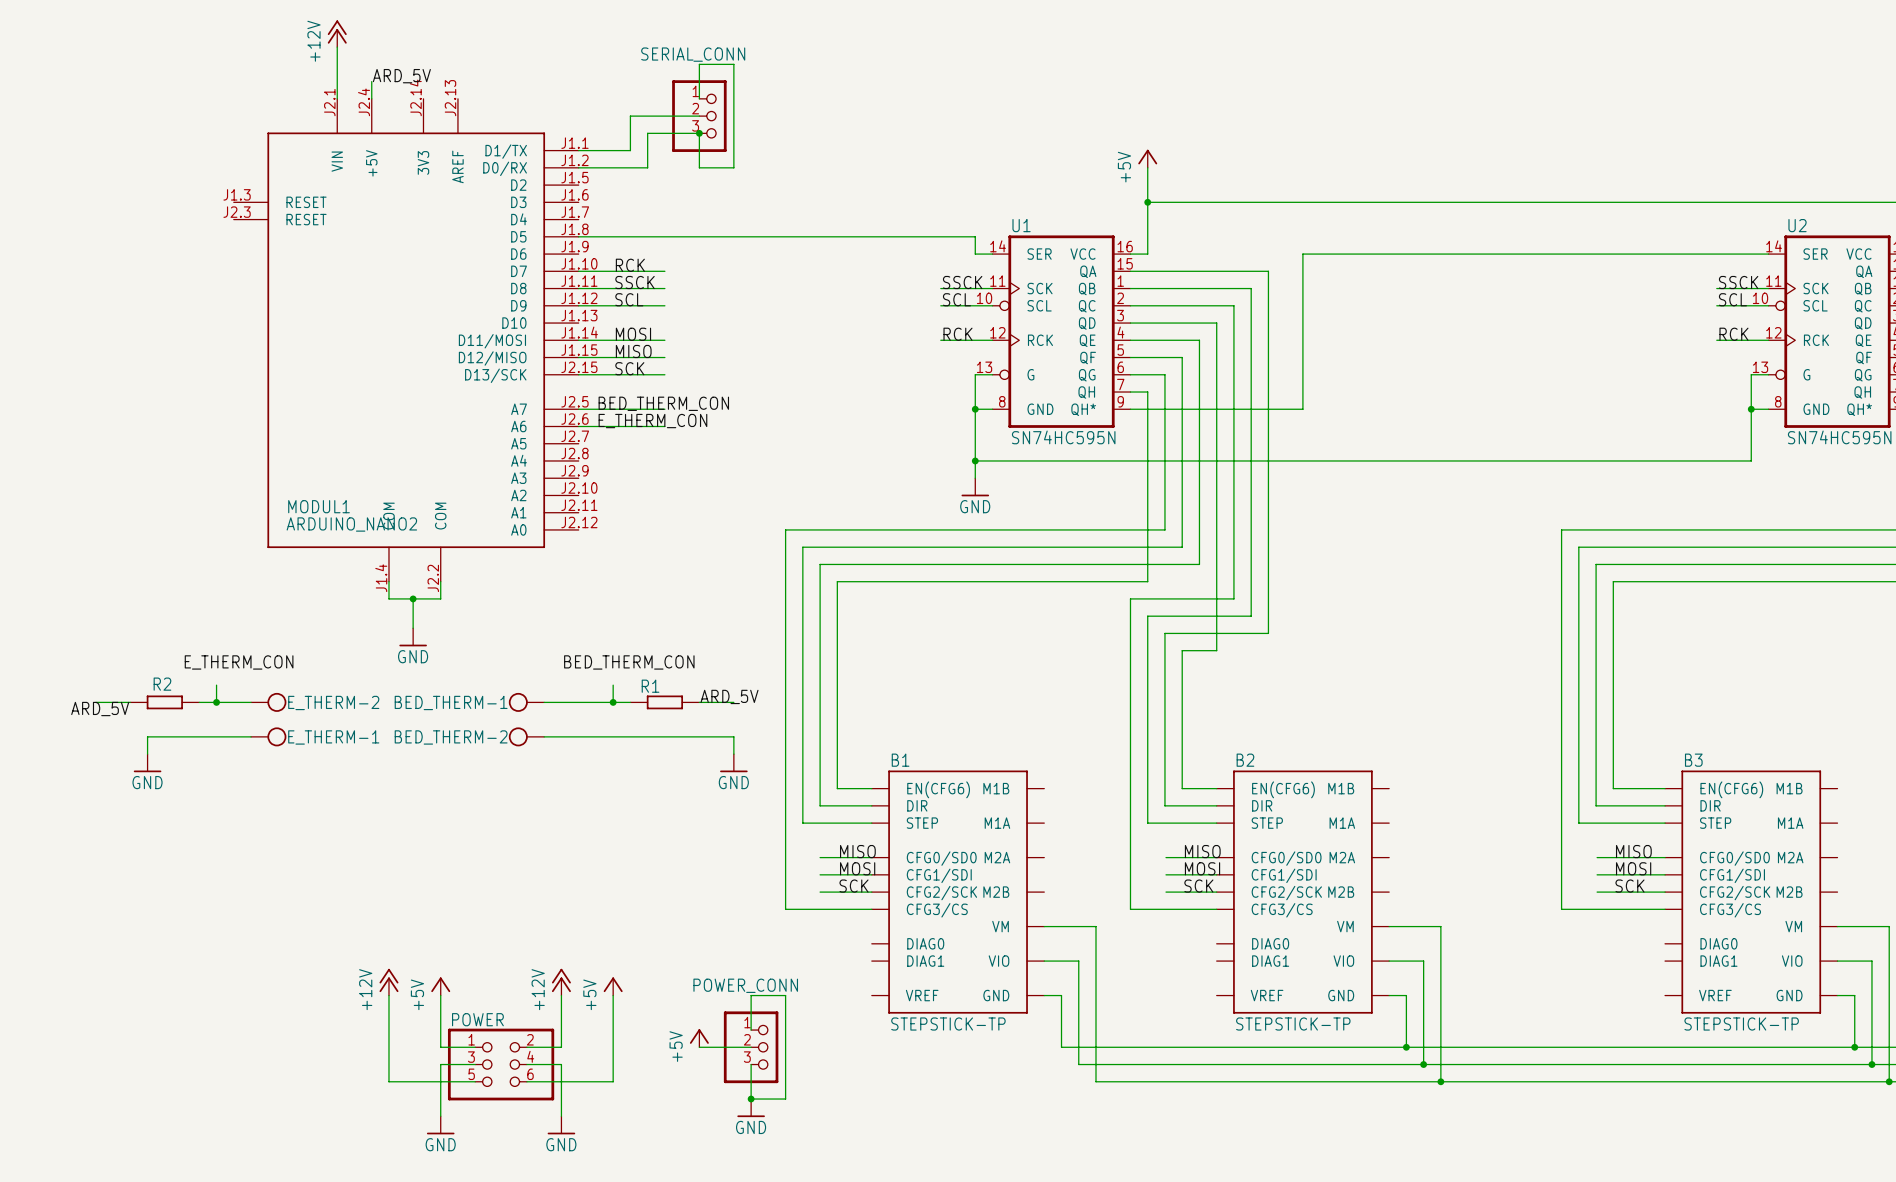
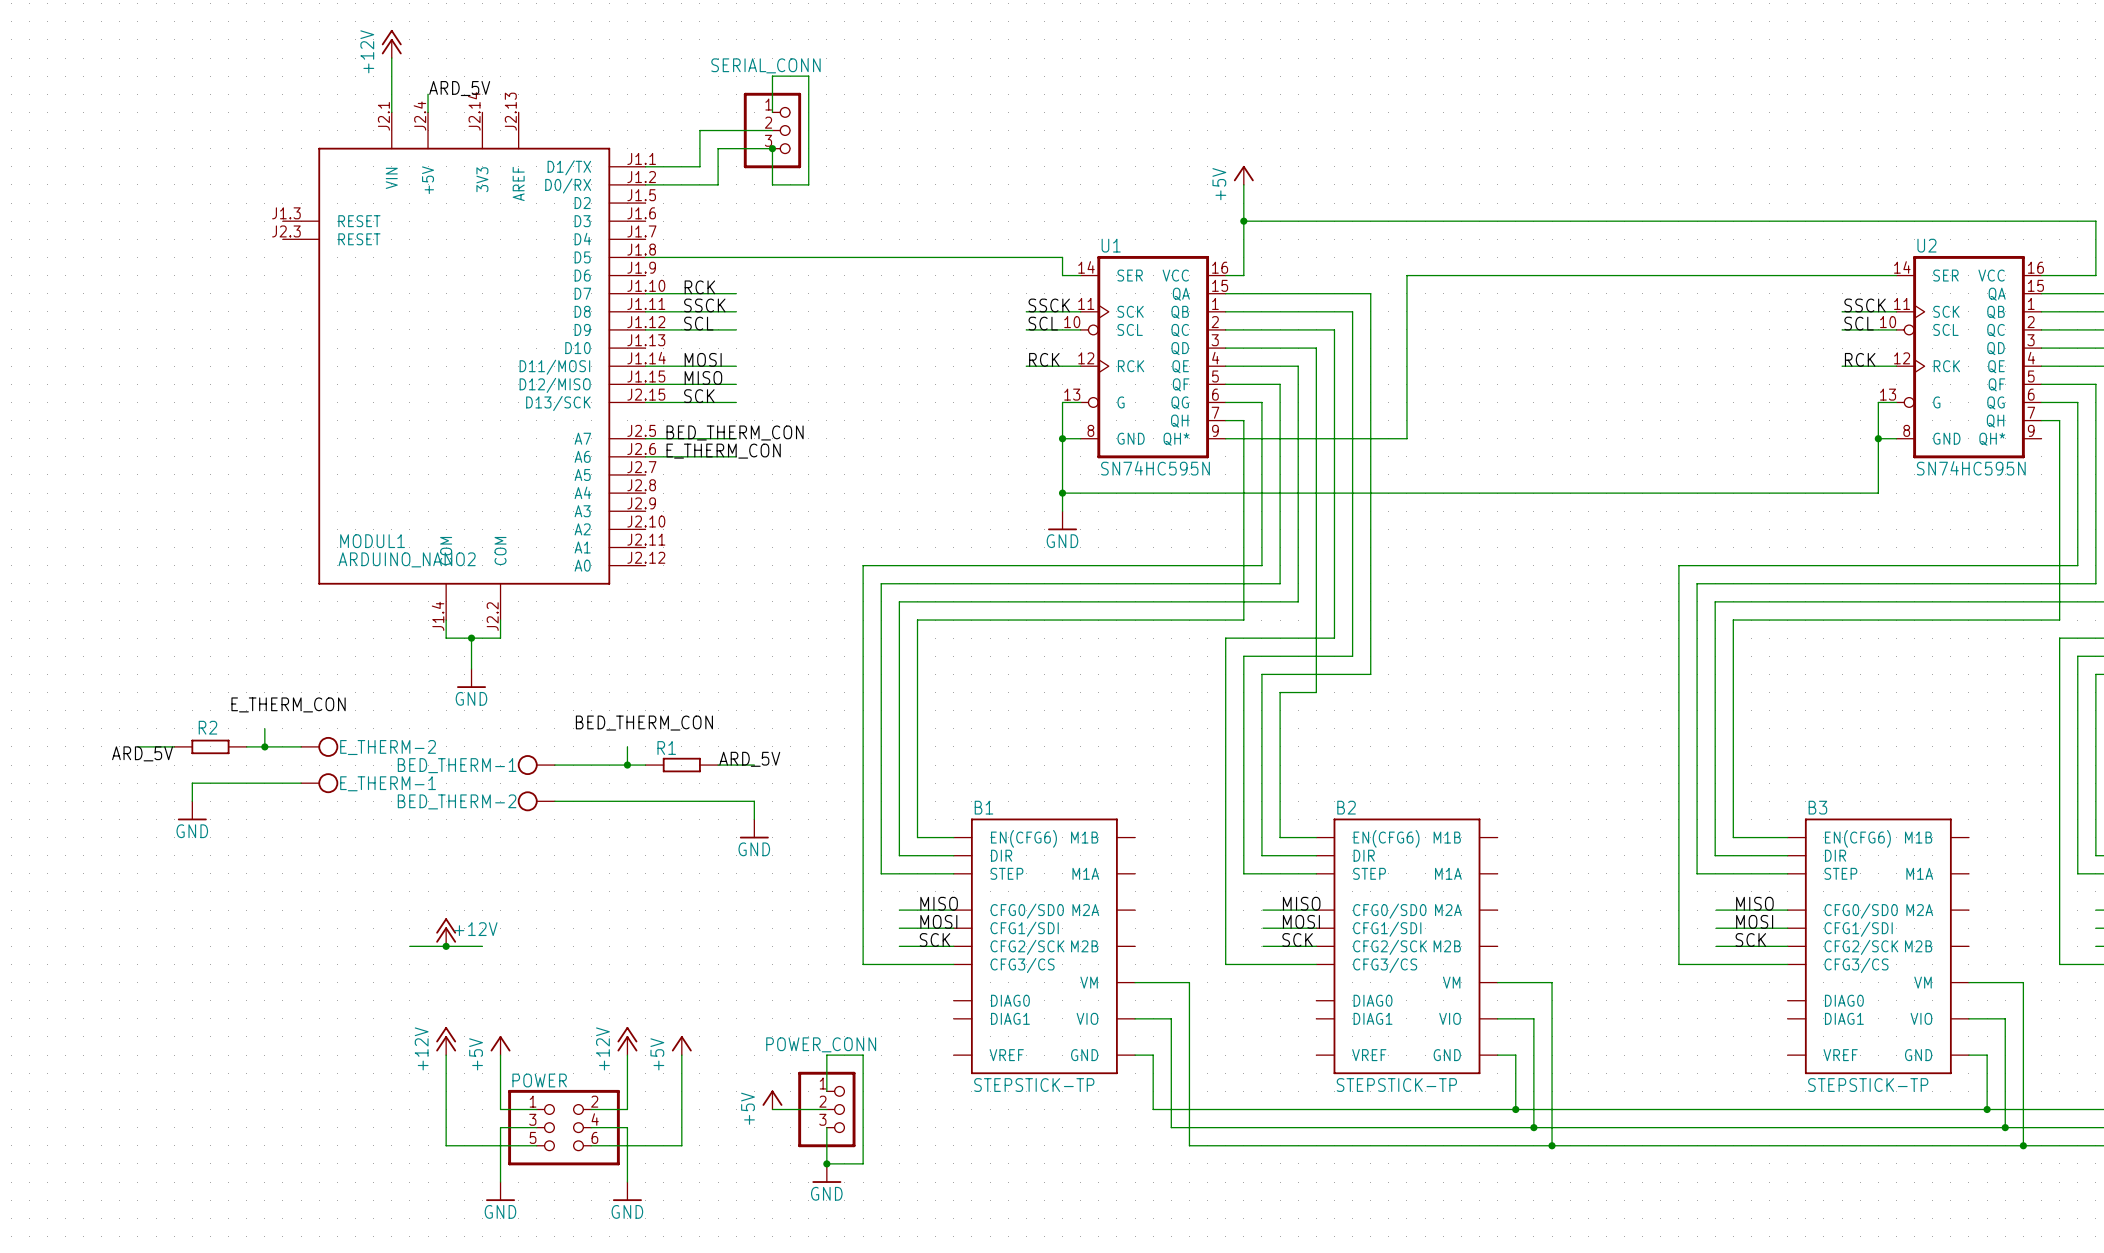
label position: BED_THERM_CON (629, 662) -> BED_THERM_CON (644, 723)
wire: (613, 685) (613, 702) -> (627, 746) (627, 765)
label position: ARD_5V (729, 696) -> ARD_5V (749, 759)
BED_THERM-1 position: (526, 702) -> (536, 765)
wire: (544, 702) (630, 702) -> (554, 765) (645, 765)
junction: (613, 702) -> none
R1 position: (664, 702) -> (681, 765)
wire: (699, 702) (733, 702) -> (718, 765) (754, 765)
junction: none -> (627, 765)
BED_THERM-2 position: (526, 736) -> (536, 801)
wire: (544, 736) (733, 736) (733, 754) -> (554, 801) (754, 801) (754, 819)
power symbol position: GND (733, 763) -> GND (754, 828)
power symbol: none -> +12V (446, 932)
wire: none -> (409, 946) (482, 946)
junction: none -> (446, 946)

